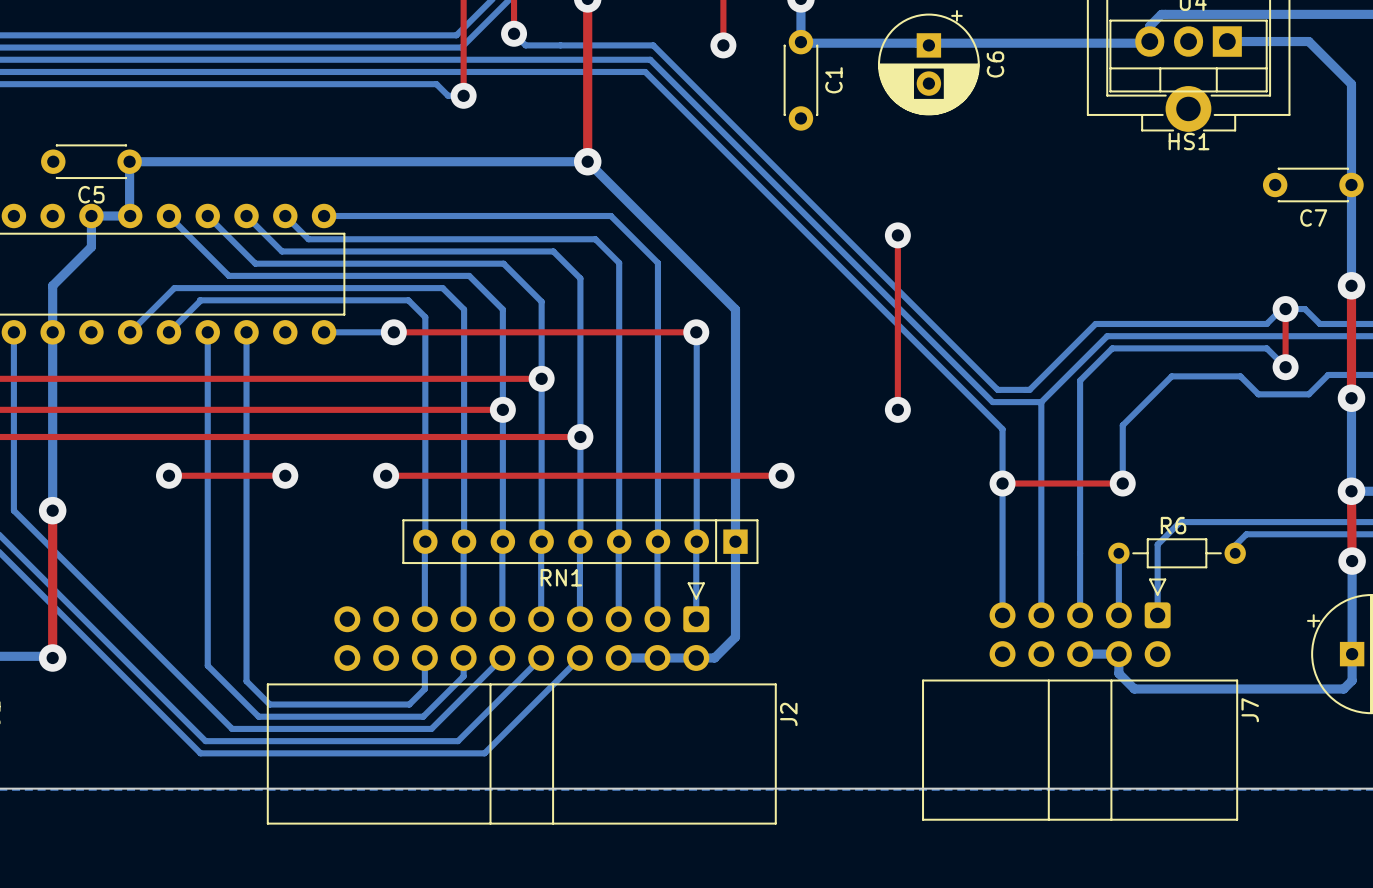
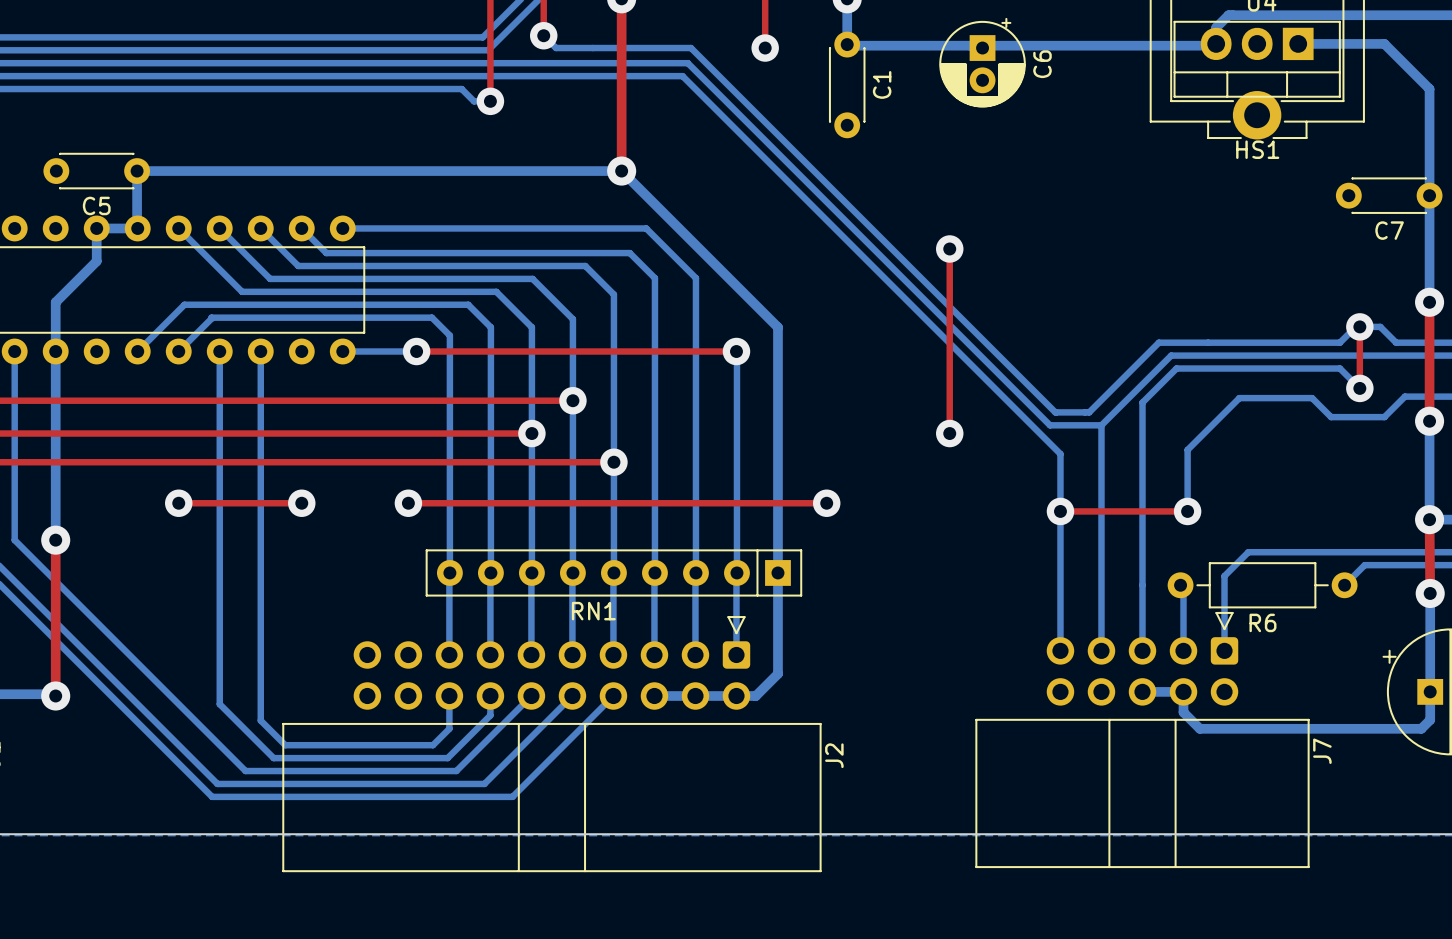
C6 footprint: [878, 10, 980, 116] -> [939, 17, 1026, 108]
R6 name position: R6 (1173, 525) -> R6 (1262, 622)
bottom track: (1290, 534) (1246, 534) (1235, 545) (1235, 553) -> (1364, 565) (1344, 585)
R6 footprint: [1108, 538, 1246, 569] -> [1167, 562, 1358, 609]

